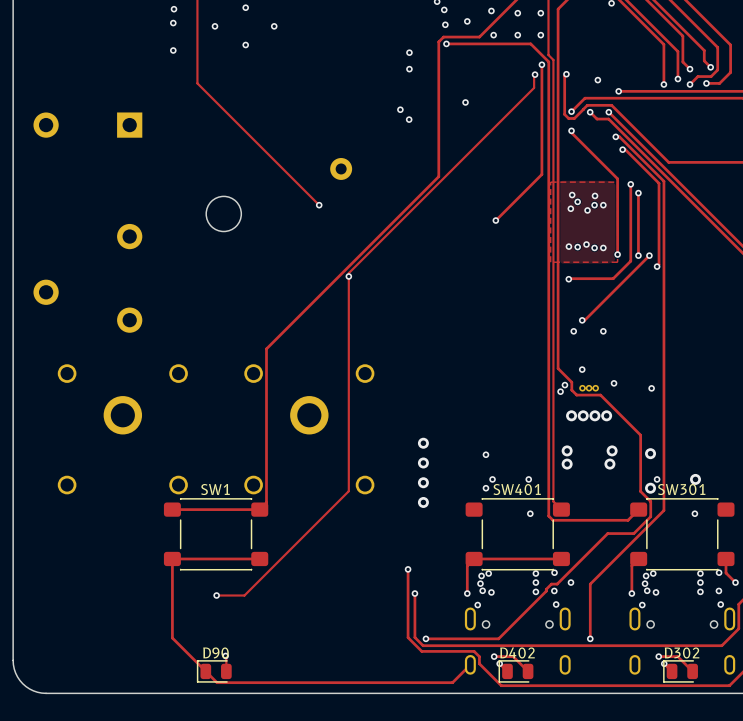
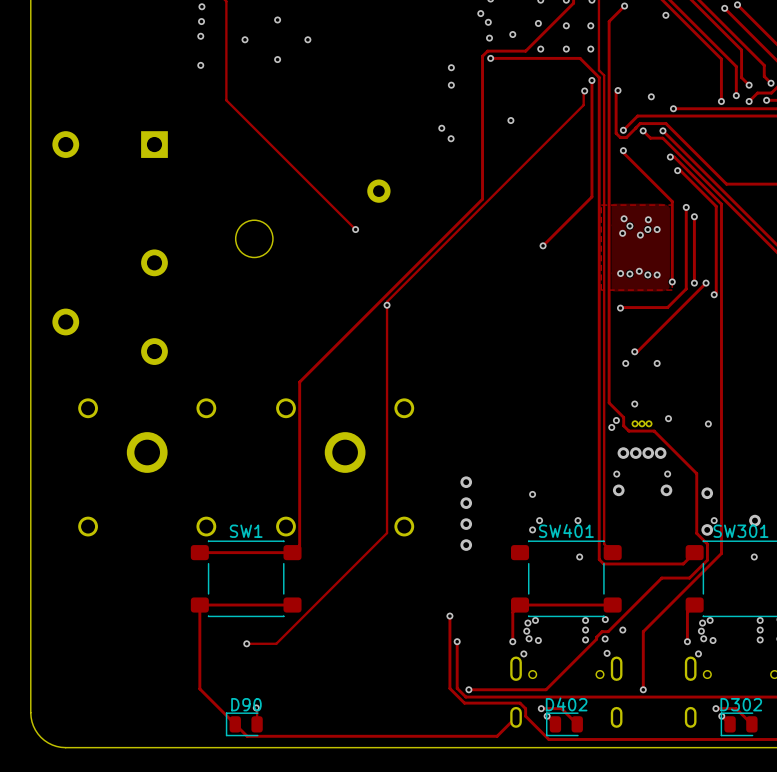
via: none -> (616, 474)
via: none -> (667, 474)
via: (567, 464) -> none
via: (609, 464) -> none

